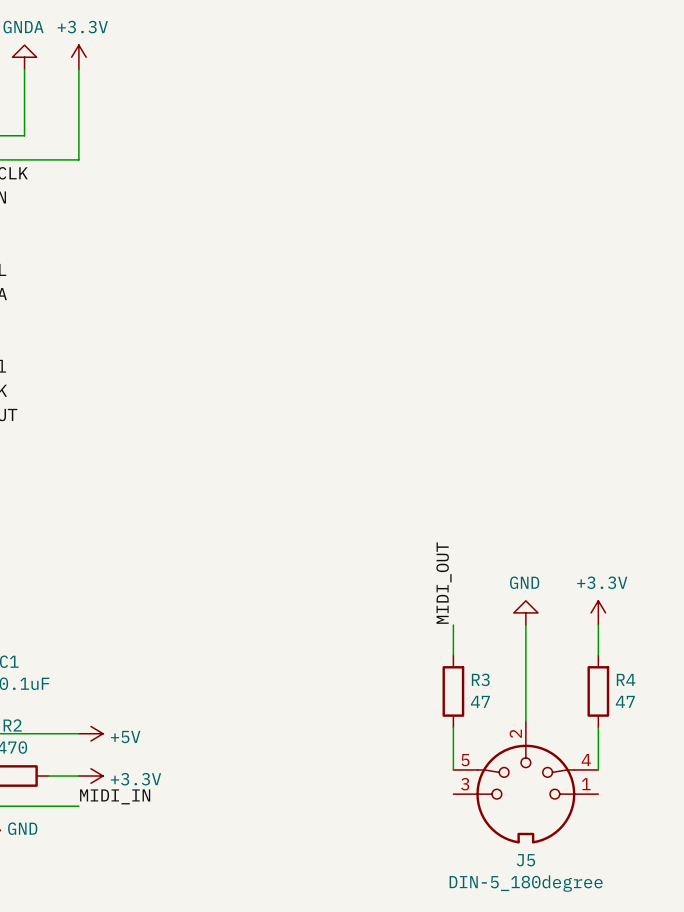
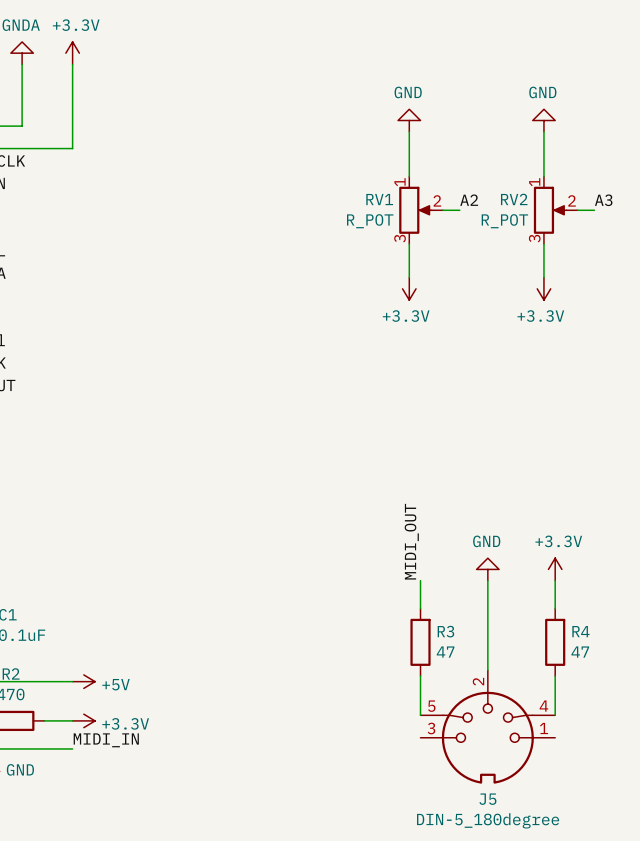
power symbol: none -> GND (409, 120)
power symbol: none -> GND (543, 120)
wire: none -> (409, 131) (409, 176)
wire: none -> (543, 131) (543, 176)
label: none -> A2 (469, 200)
label: none -> A3 (603, 200)
RV1: none -> R_POT (421, 210)
wire: none -> (442, 210) (459, 210)
RV2: none -> R_POT (555, 210)
wire: none -> (577, 210) (594, 210)
wire: none -> (409, 243) (409, 277)
wire: none -> (543, 243) (543, 277)
power symbol: none -> +3.3V (409, 288)
power symbol: none -> +3.3V (543, 288)

